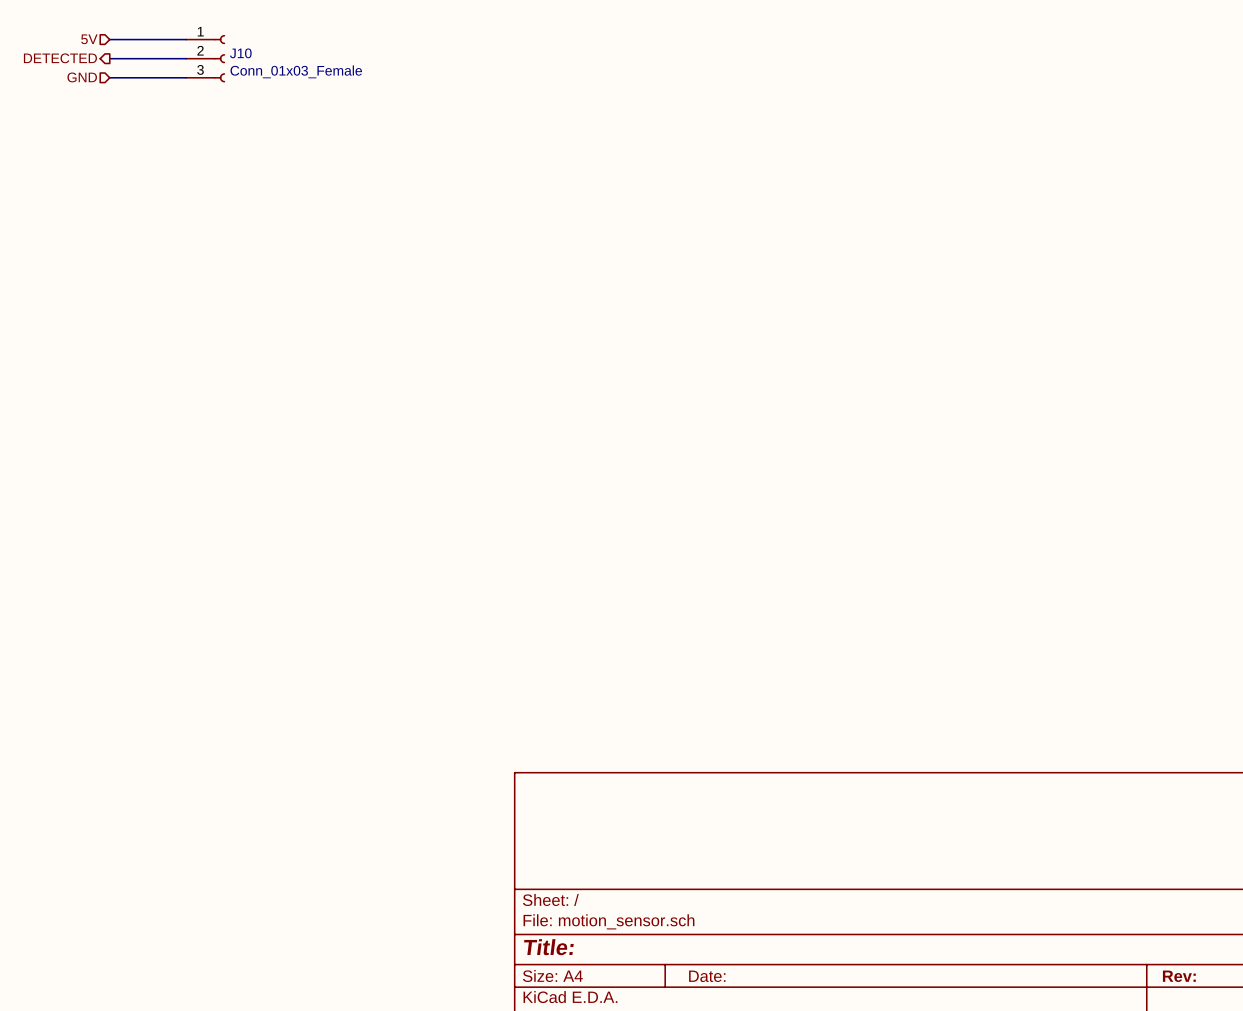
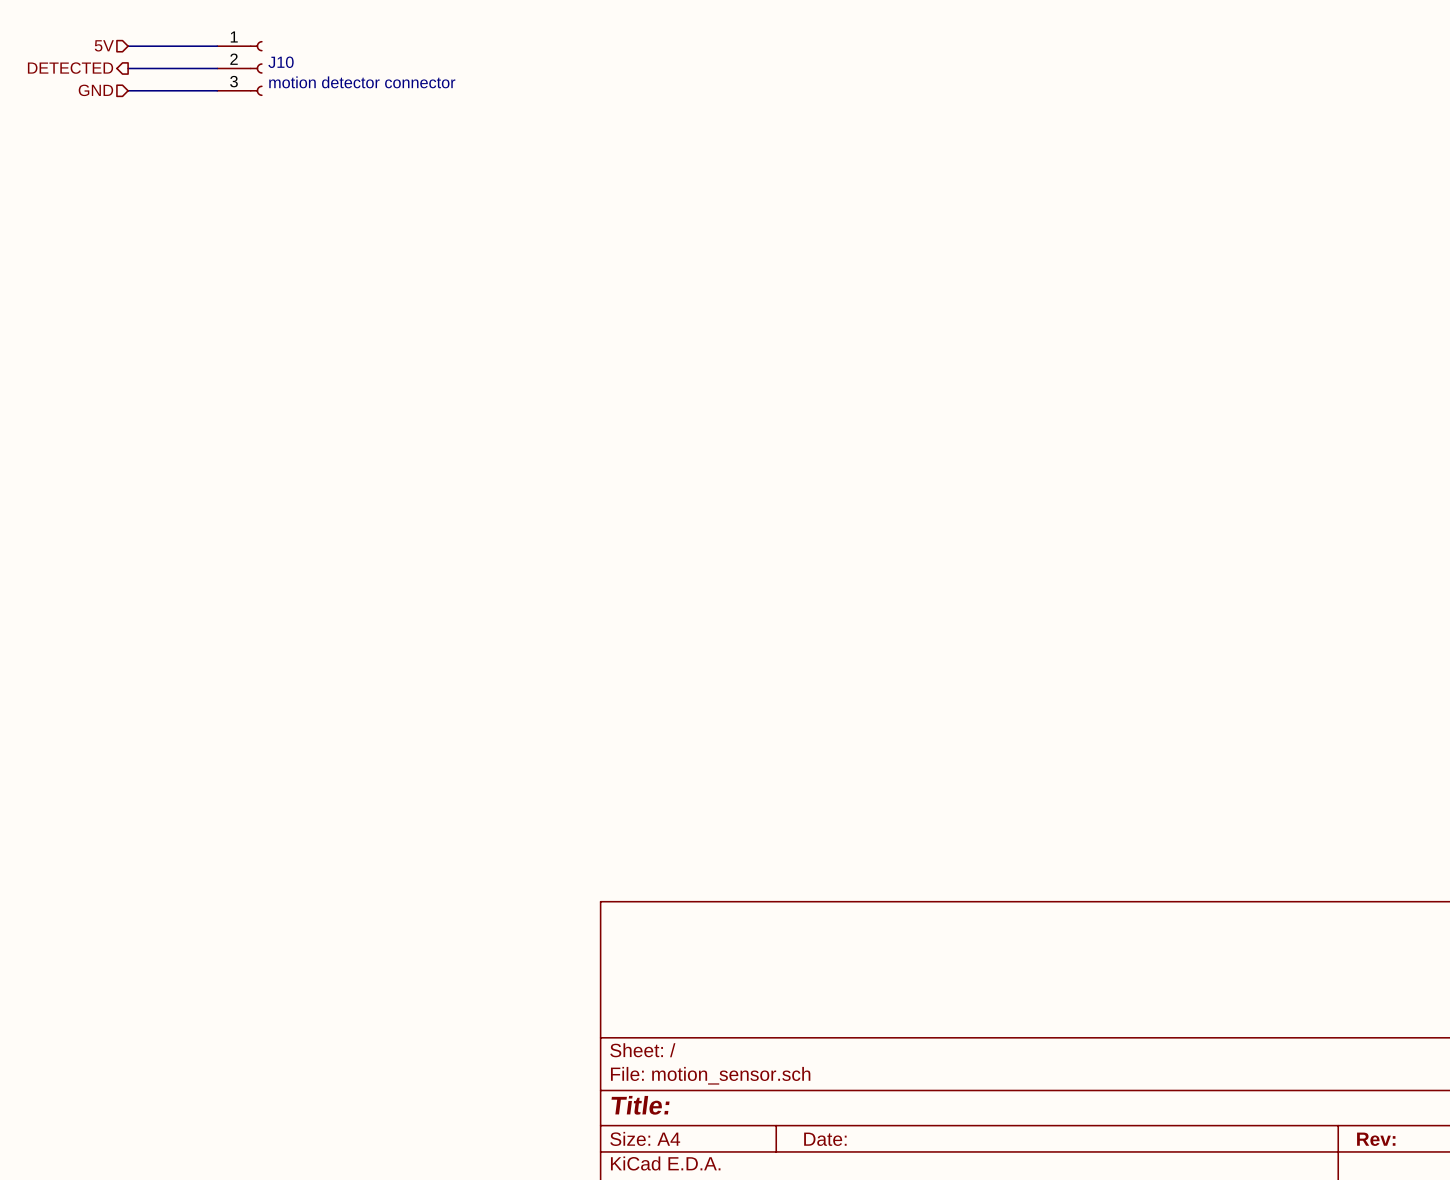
J10 value: Conn_01x03_Female (296, 71) -> motion detector connector (362, 82)

